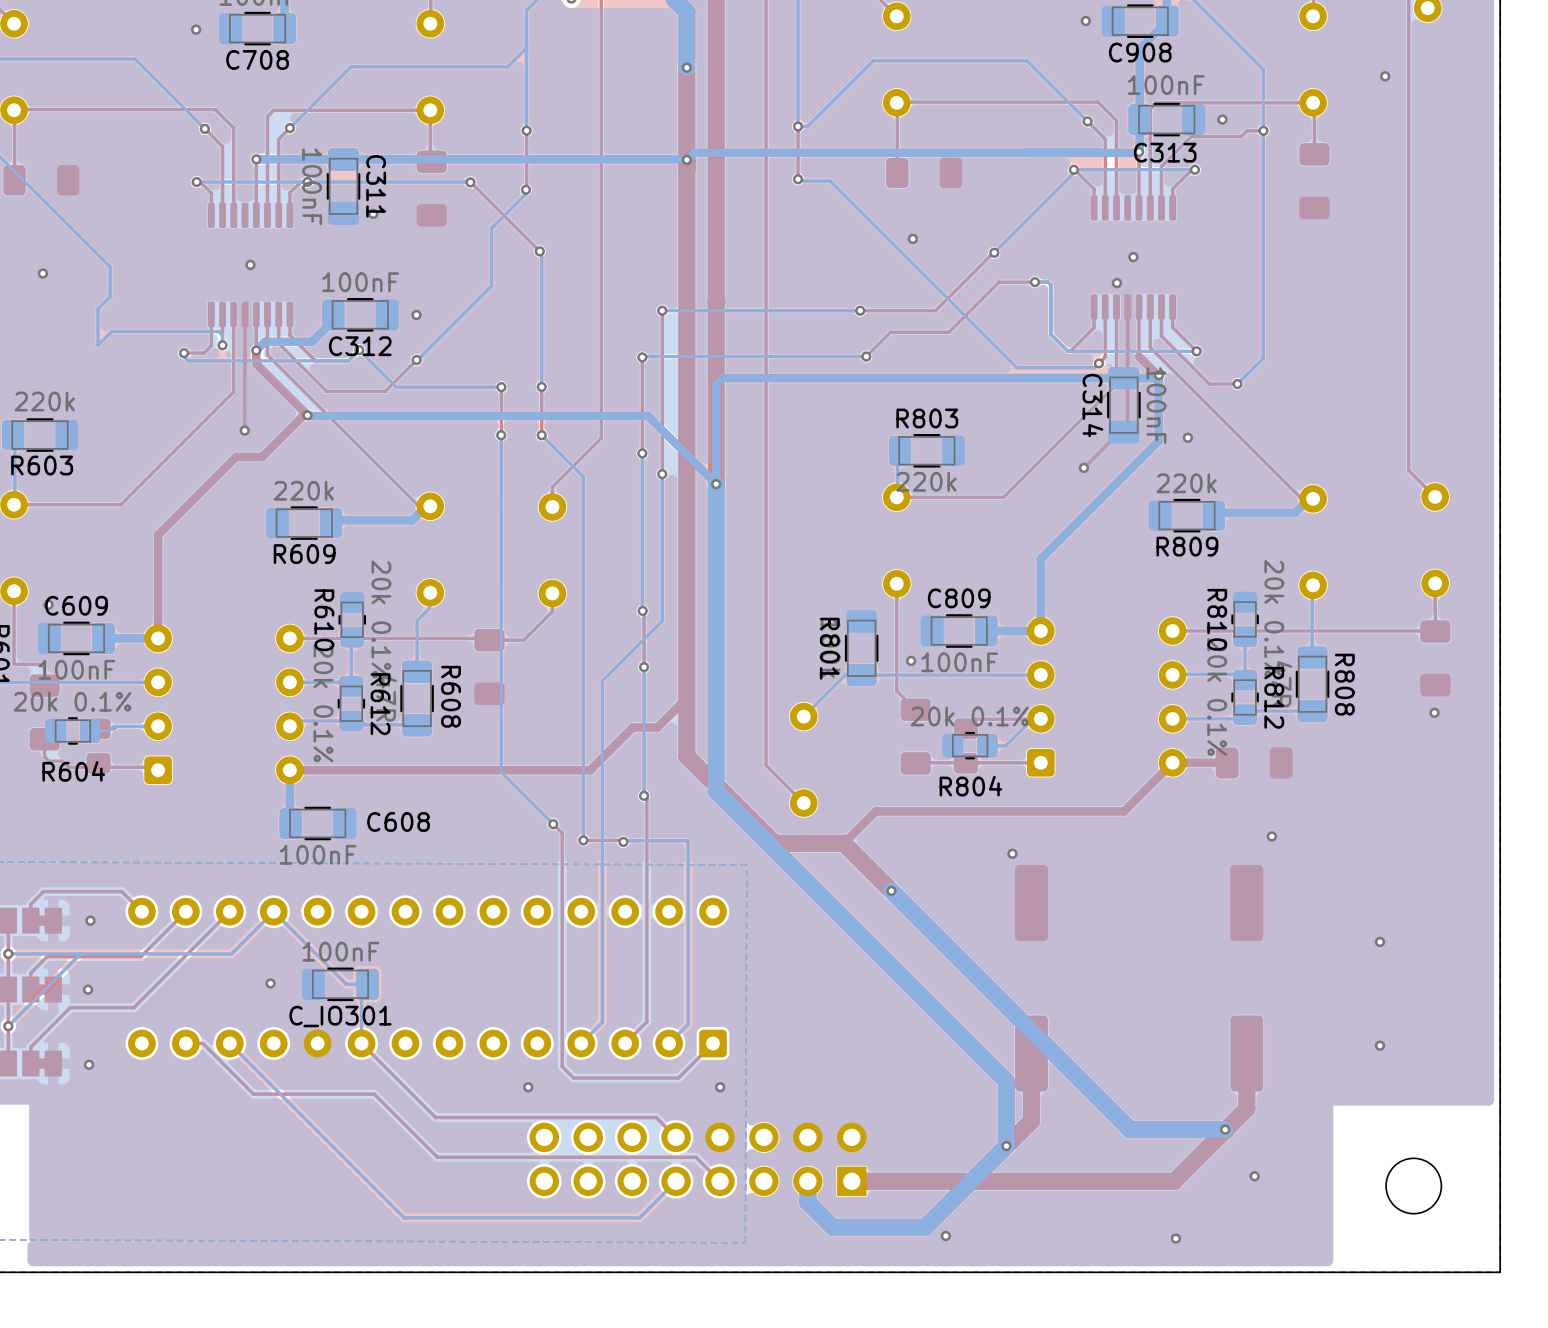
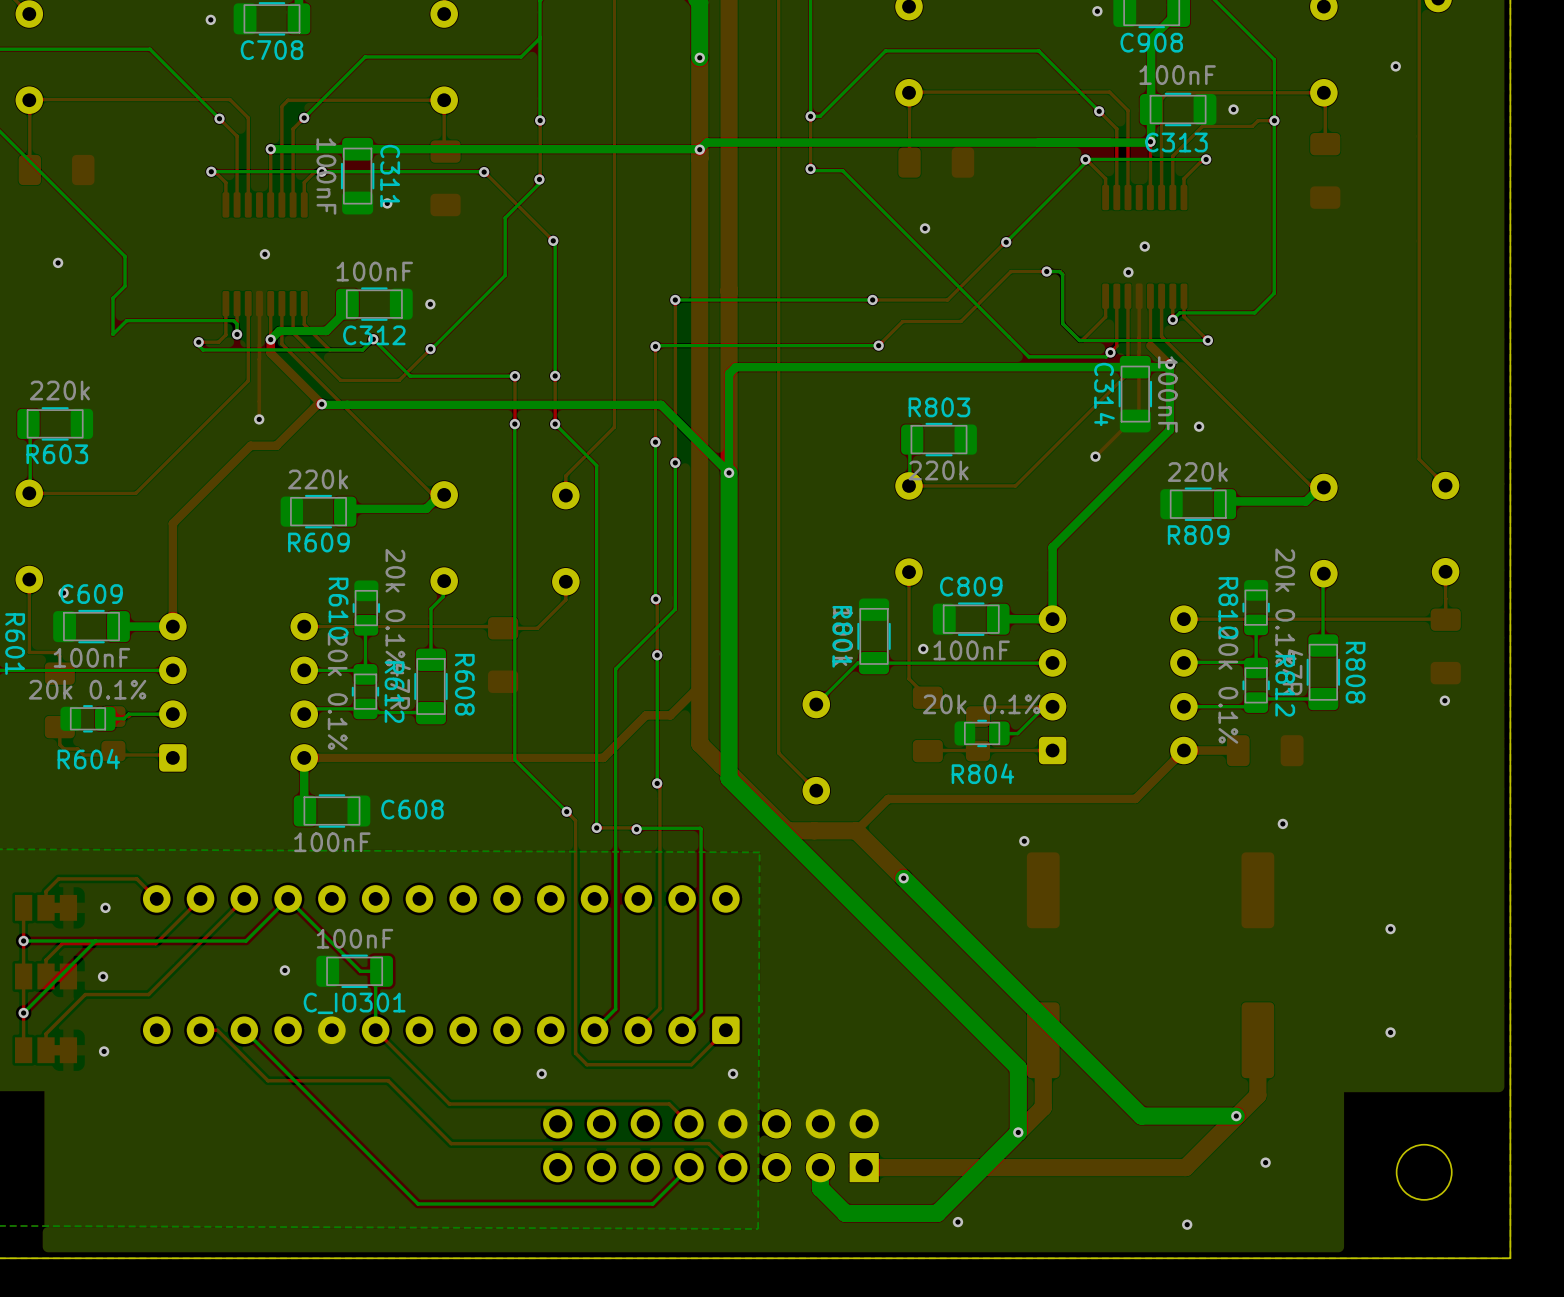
bottom track: (1263, 304) (1263, 358) (1237, 384) -> (1274, 293) (1254, 312) (1179, 312) (1172, 319)
top track: (1161, 330) (1161, 336) (1209, 384) (1237, 384) -> none
via position: (1237, 384) -> (1172, 319)

